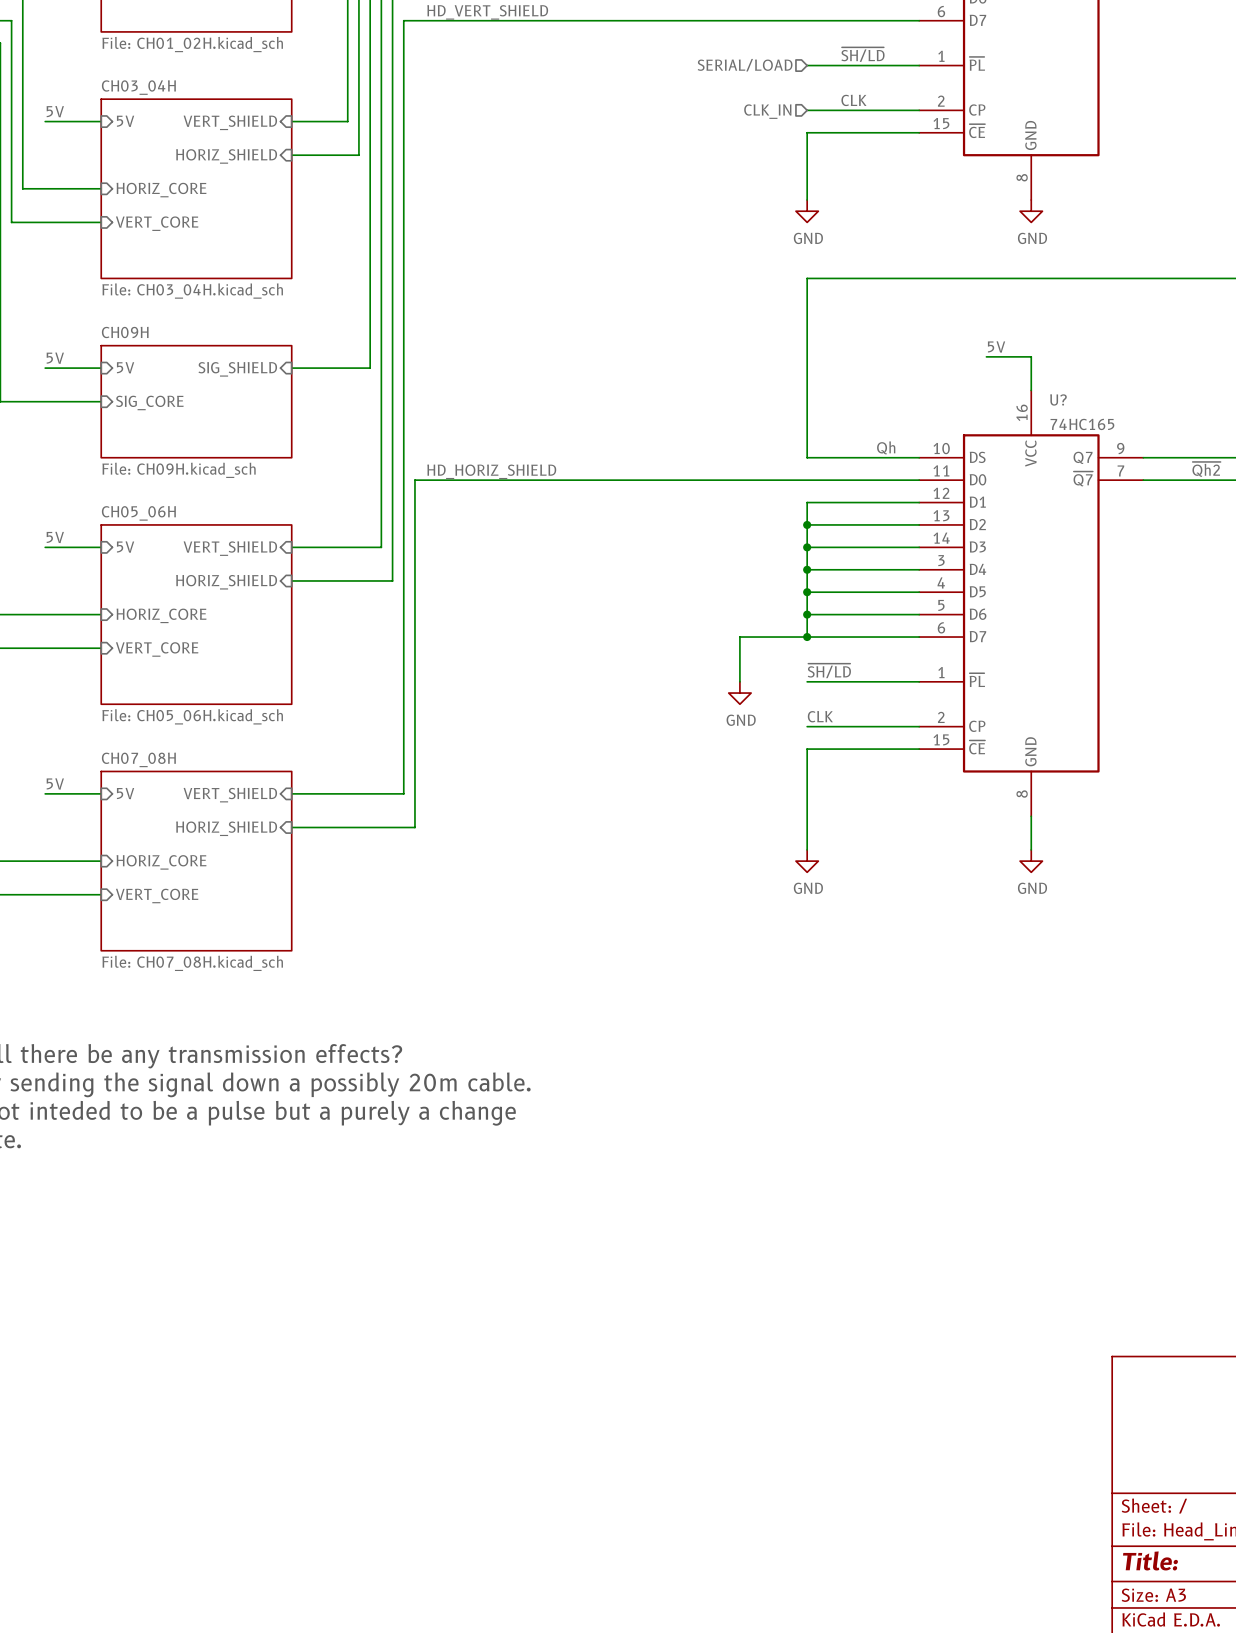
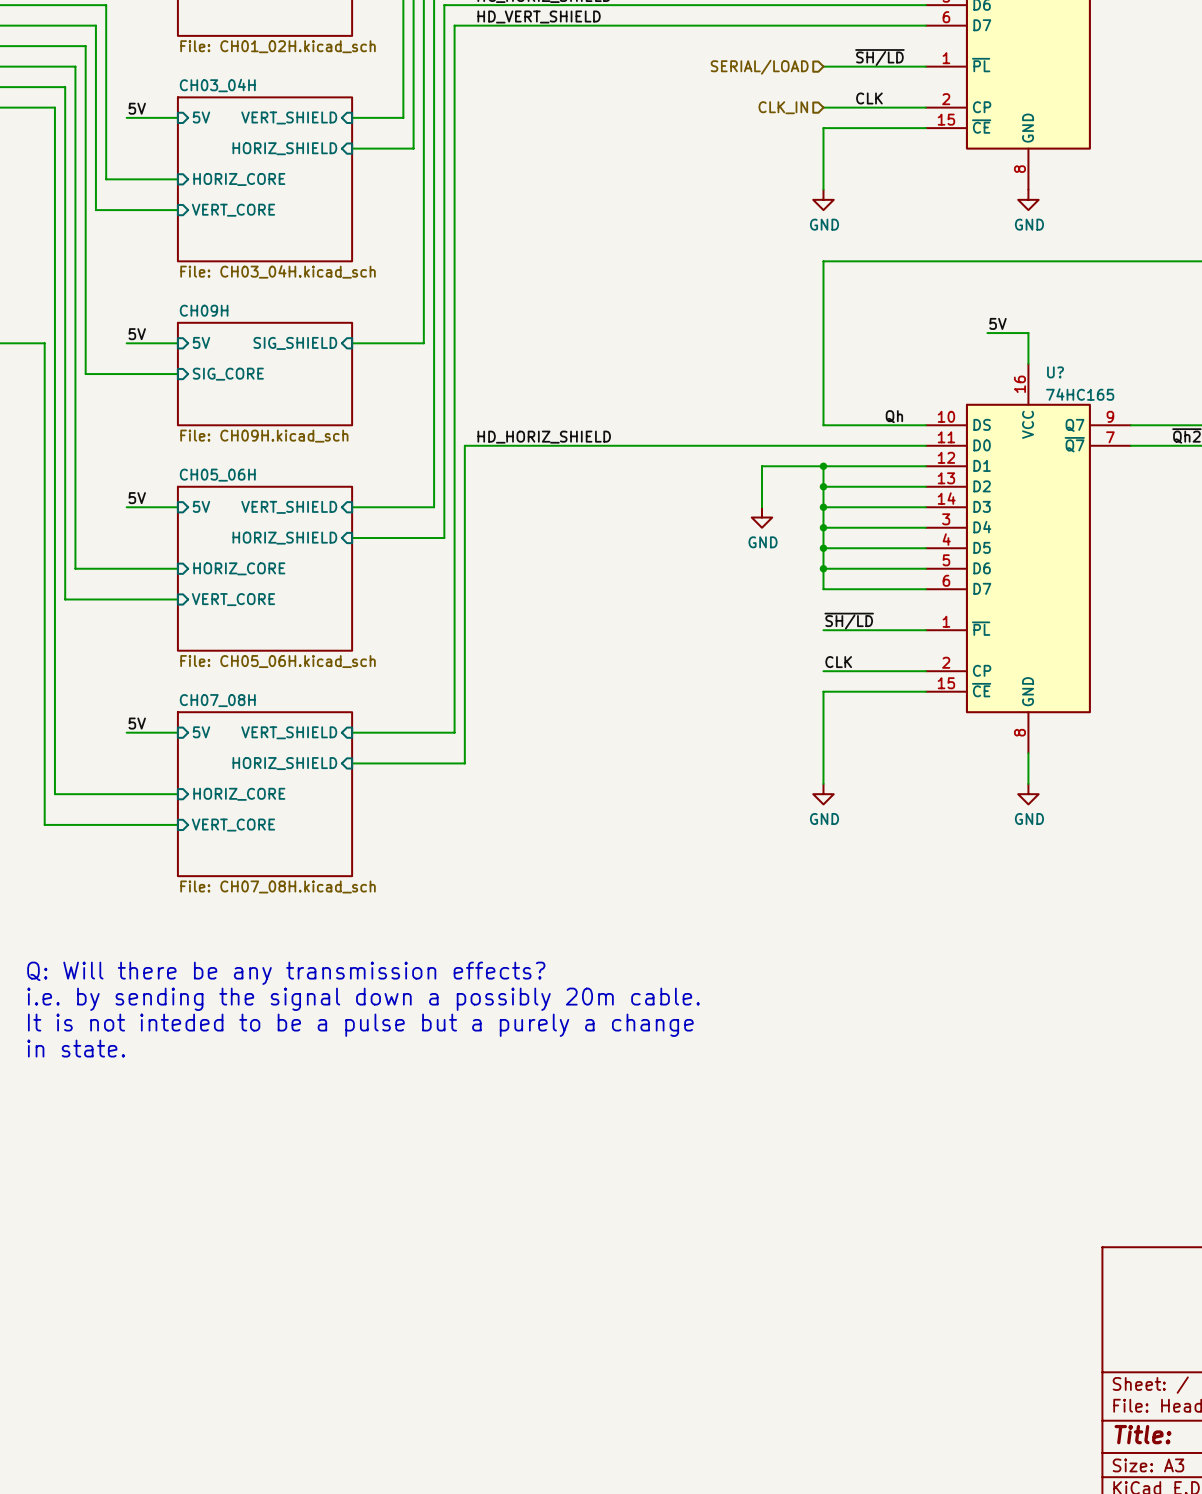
junction: none -> (823, 466)
wire: (807, 637) (739, 637) (739, 681) -> (823, 466) (762, 466) (762, 507)
junction: (807, 637) -> none
power symbol position: GND (739, 693) -> GND (762, 517)

